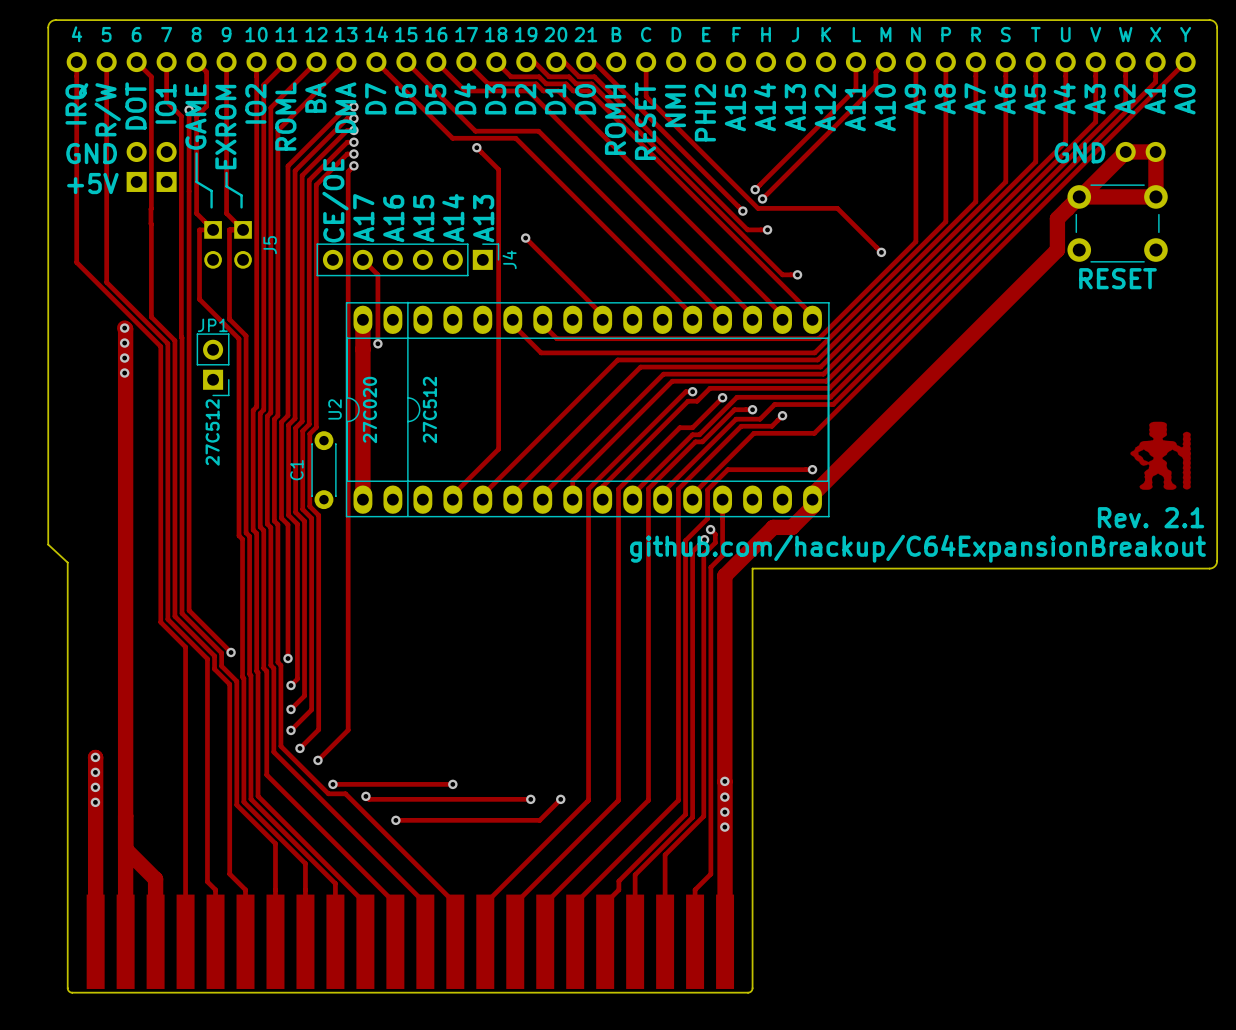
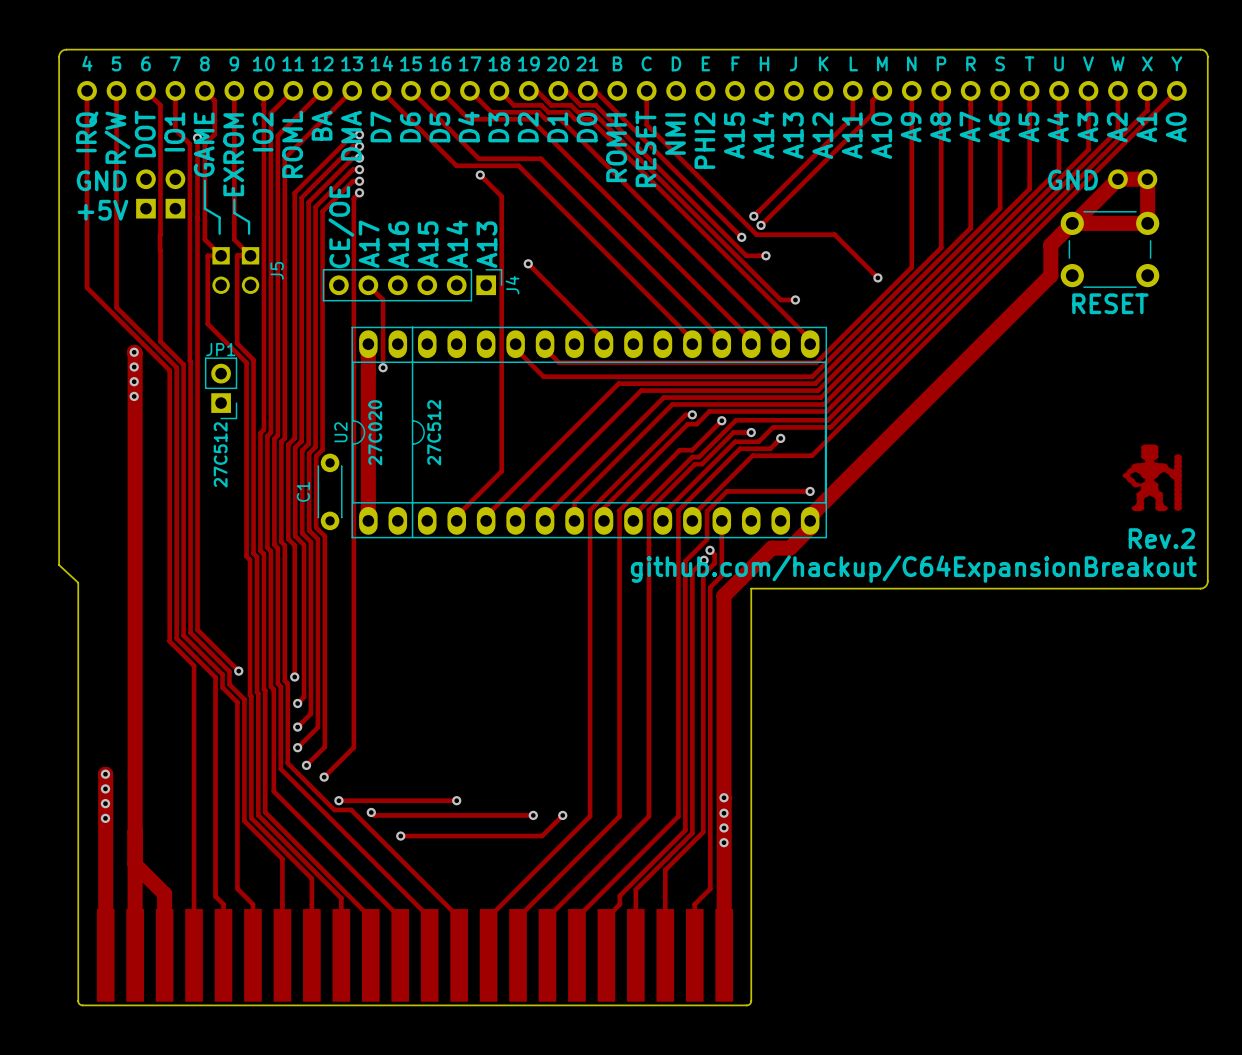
text: Rev. 2.1 (1151, 517) -> Rev.2 (1161, 538)

